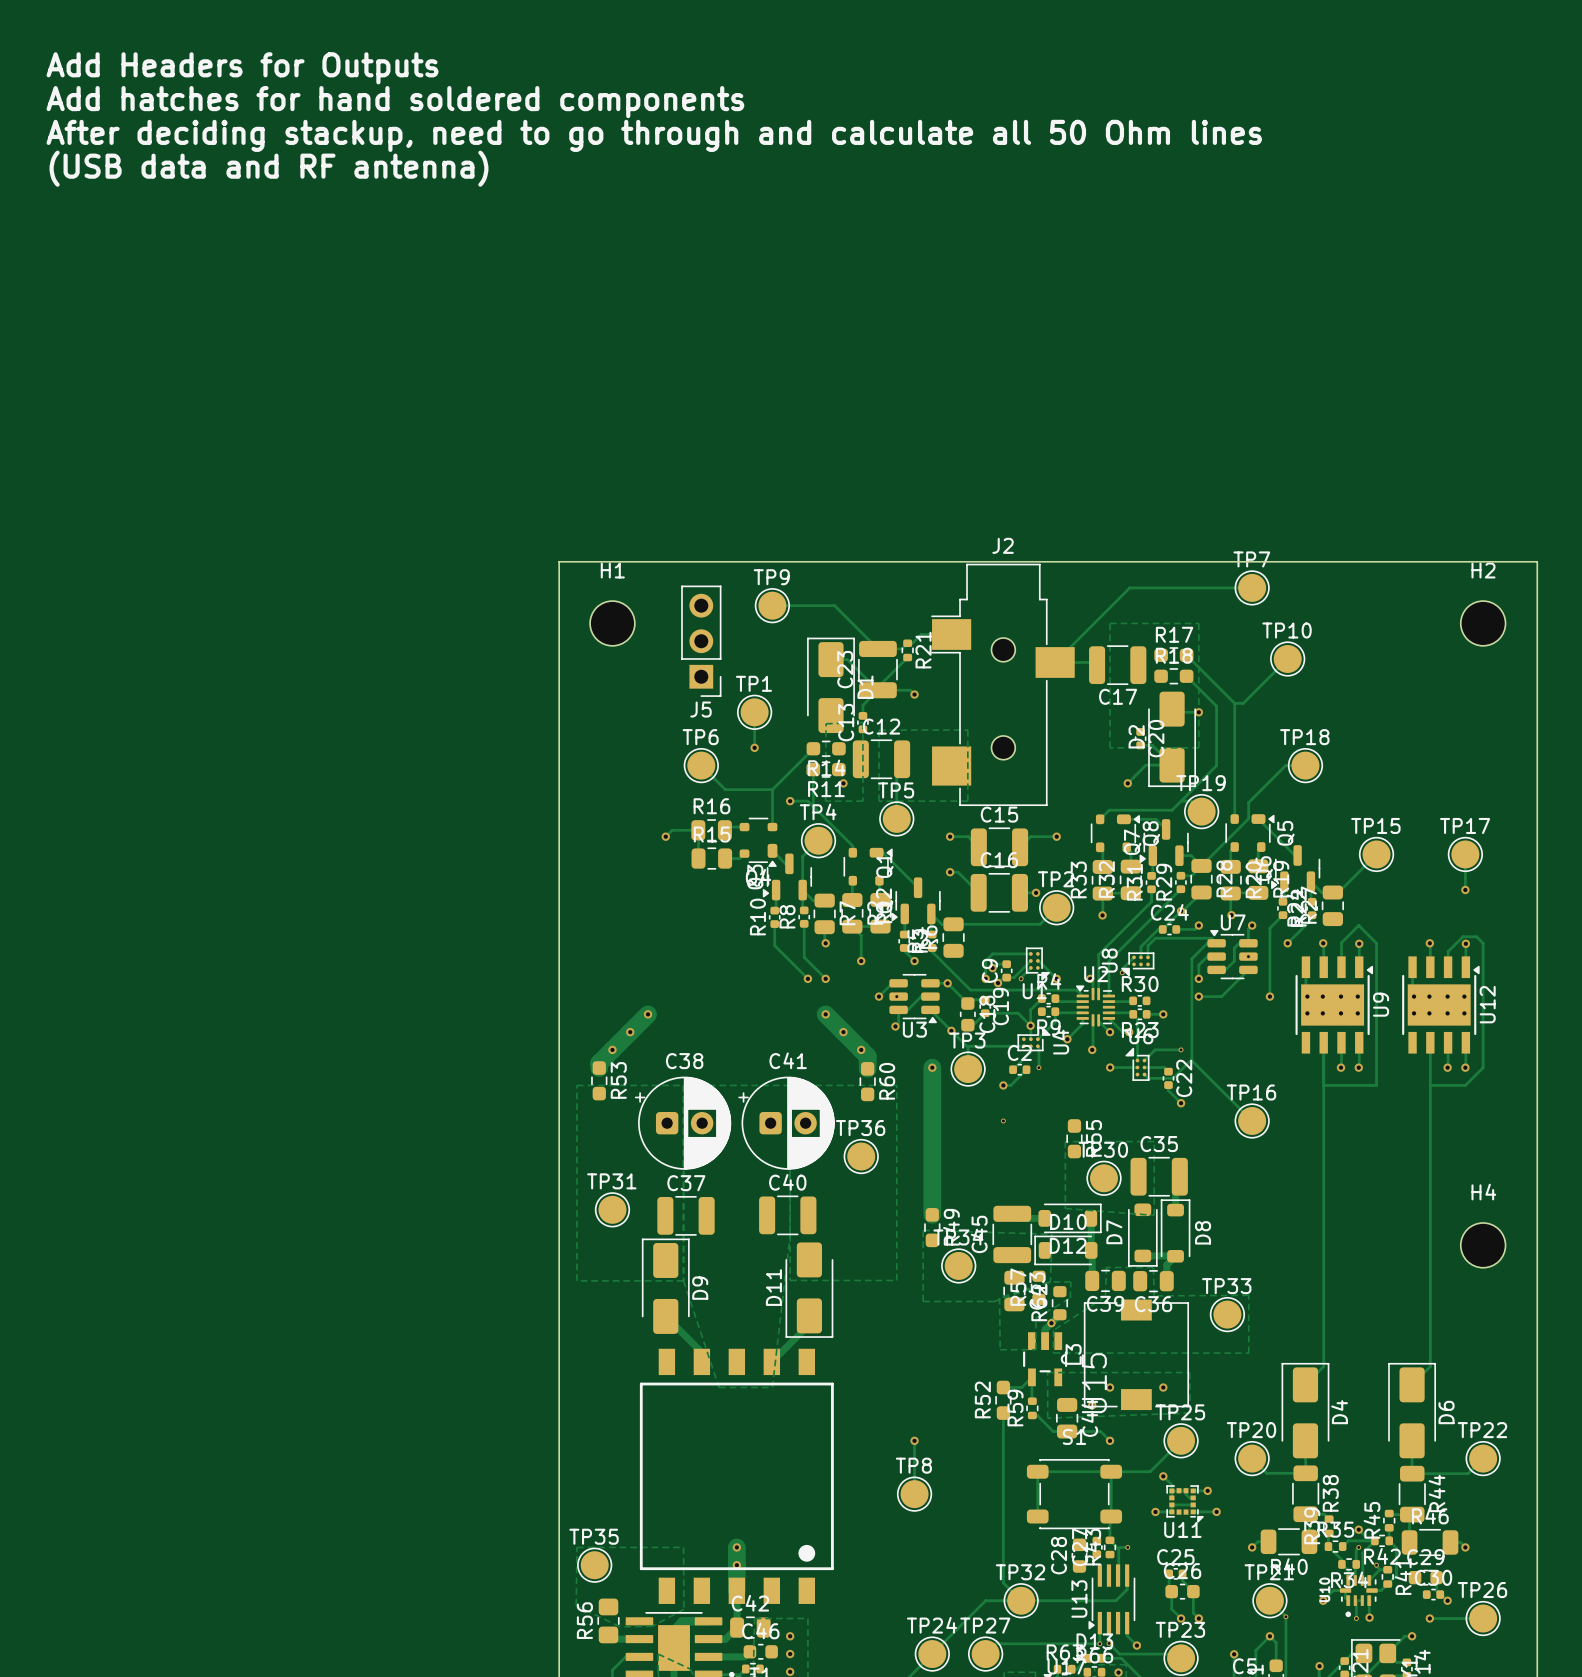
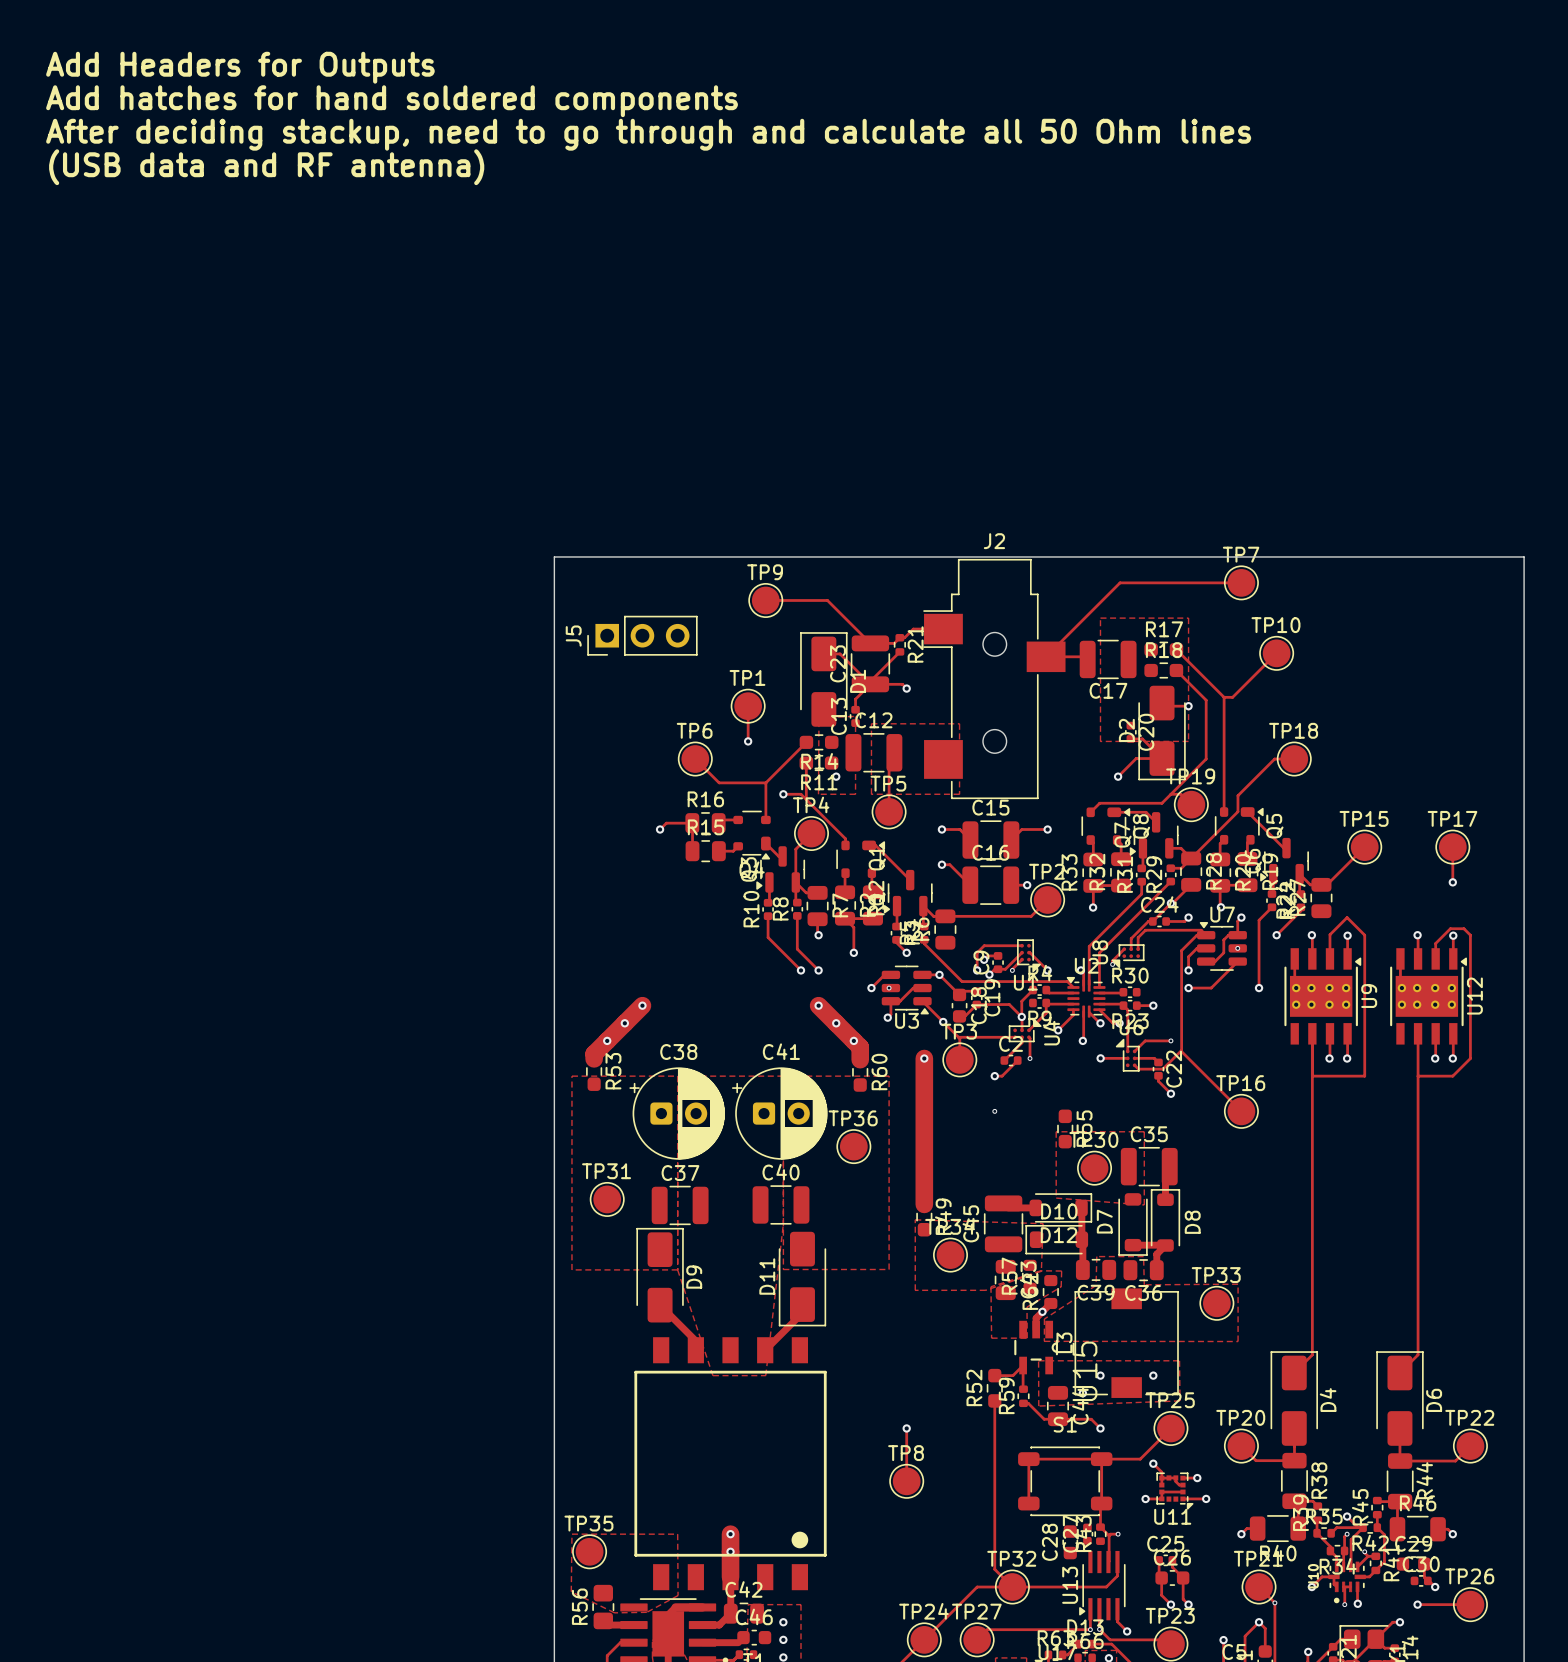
H1: (612, 623) -> none
H2: (1483, 623) -> none
J5 rotation: 0° (701, 641) -> 90° clockwise (642, 635)
H4: (1483, 1245) -> none

